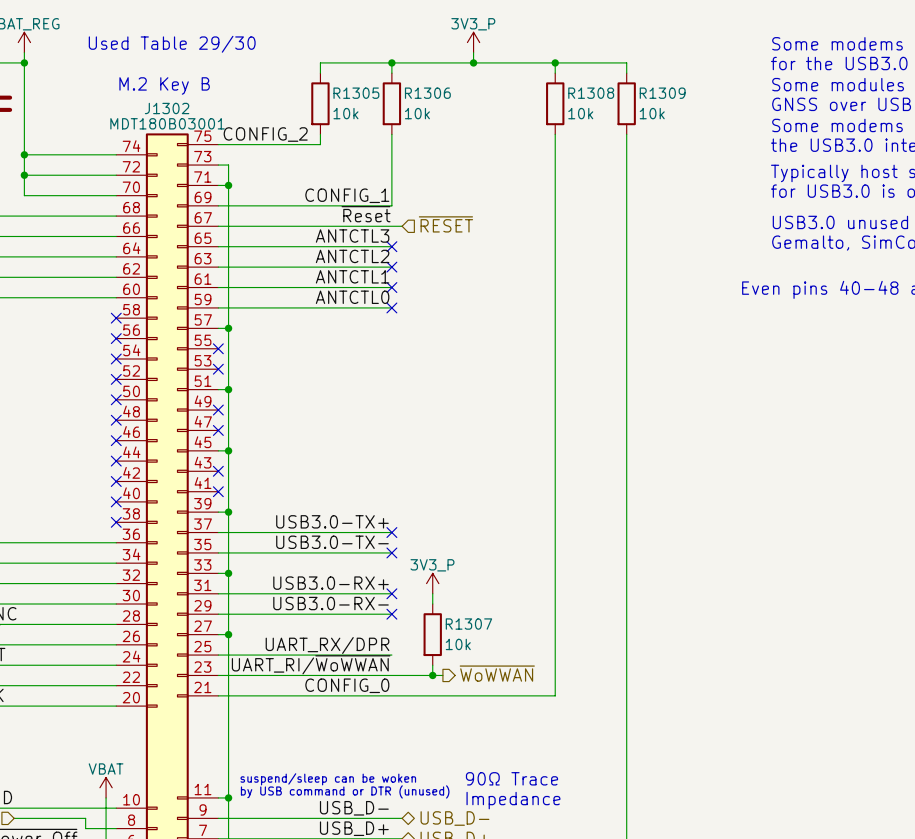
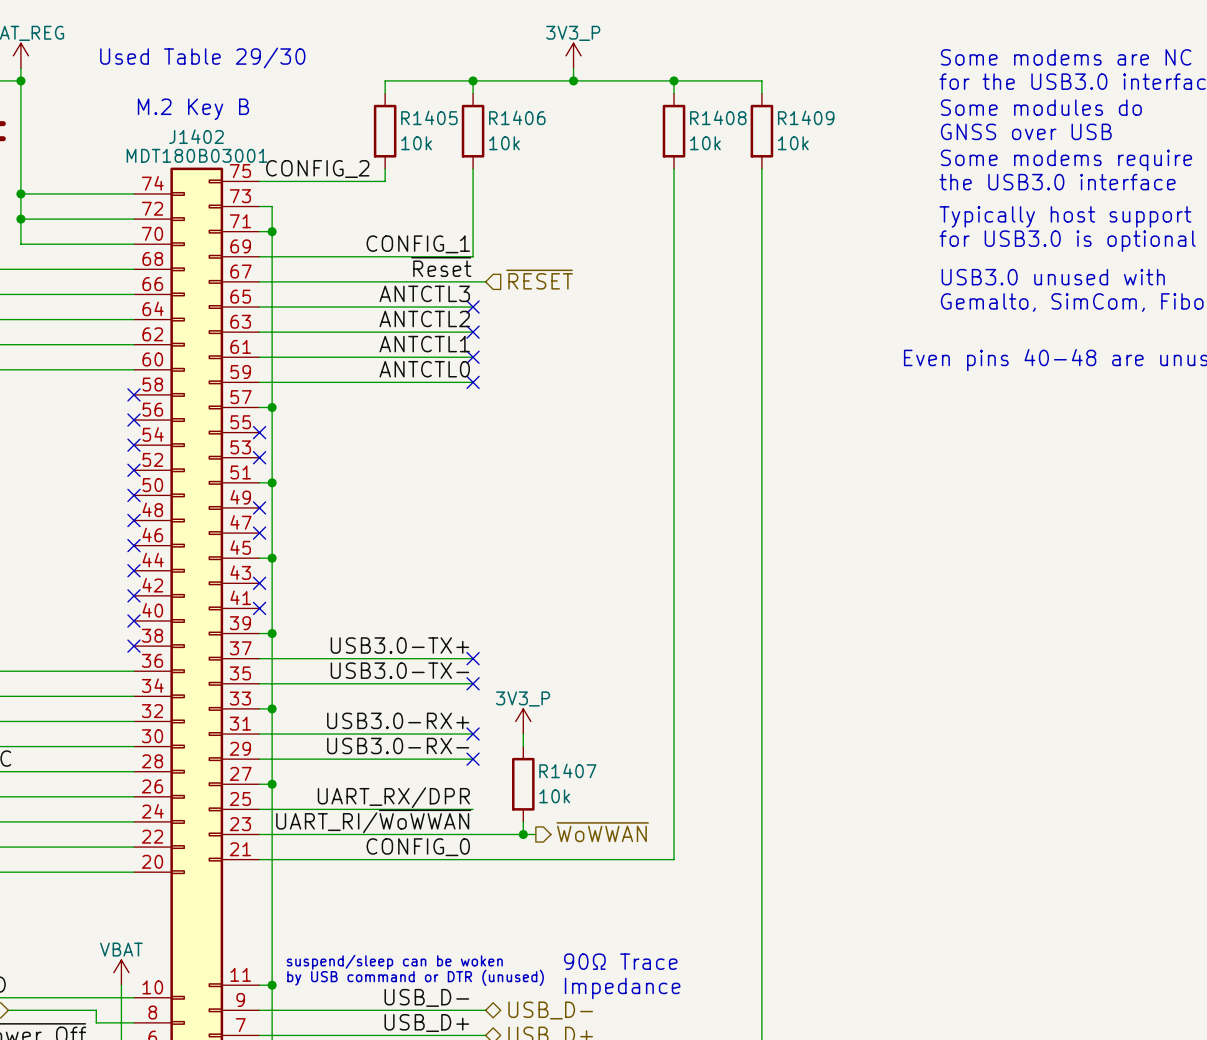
R1305 name: R1305 (356, 93) -> R1405 (429, 117)
R1306 name: R1306 (427, 93) -> R1406 (517, 117)
R1308 name: R1308 (591, 93) -> R1408 (718, 117)
R1309 name: R1309 (662, 93) -> R1409 (806, 117)
J1302 name: J1302 (167, 108) -> J1402 (196, 136)
R1307 name: R1307 (468, 624) -> R1407 (567, 770)

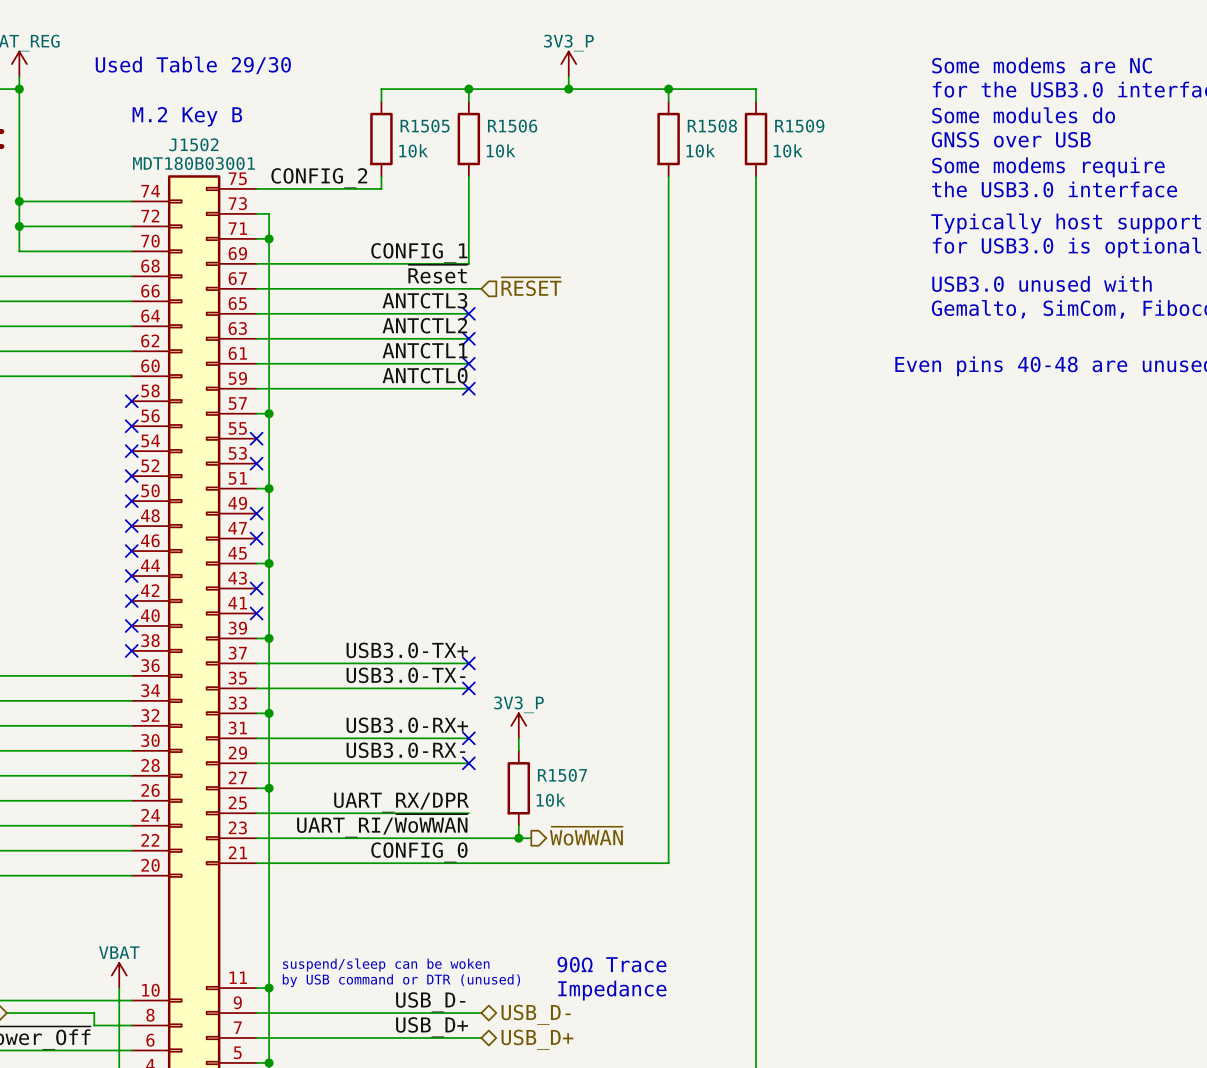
R1405 name: R1405 (429, 117) -> R1505 (425, 126)
R1406 name: R1406 (517, 117) -> R1506 (512, 126)
R1408 name: R1408 (718, 117) -> R1508 (712, 126)
R1409 name: R1409 (806, 117) -> R1509 (799, 126)
J1402 name: J1402 (196, 136) -> J1502 (193, 144)
R1407 name: R1407 (567, 770) -> R1507 (562, 775)

